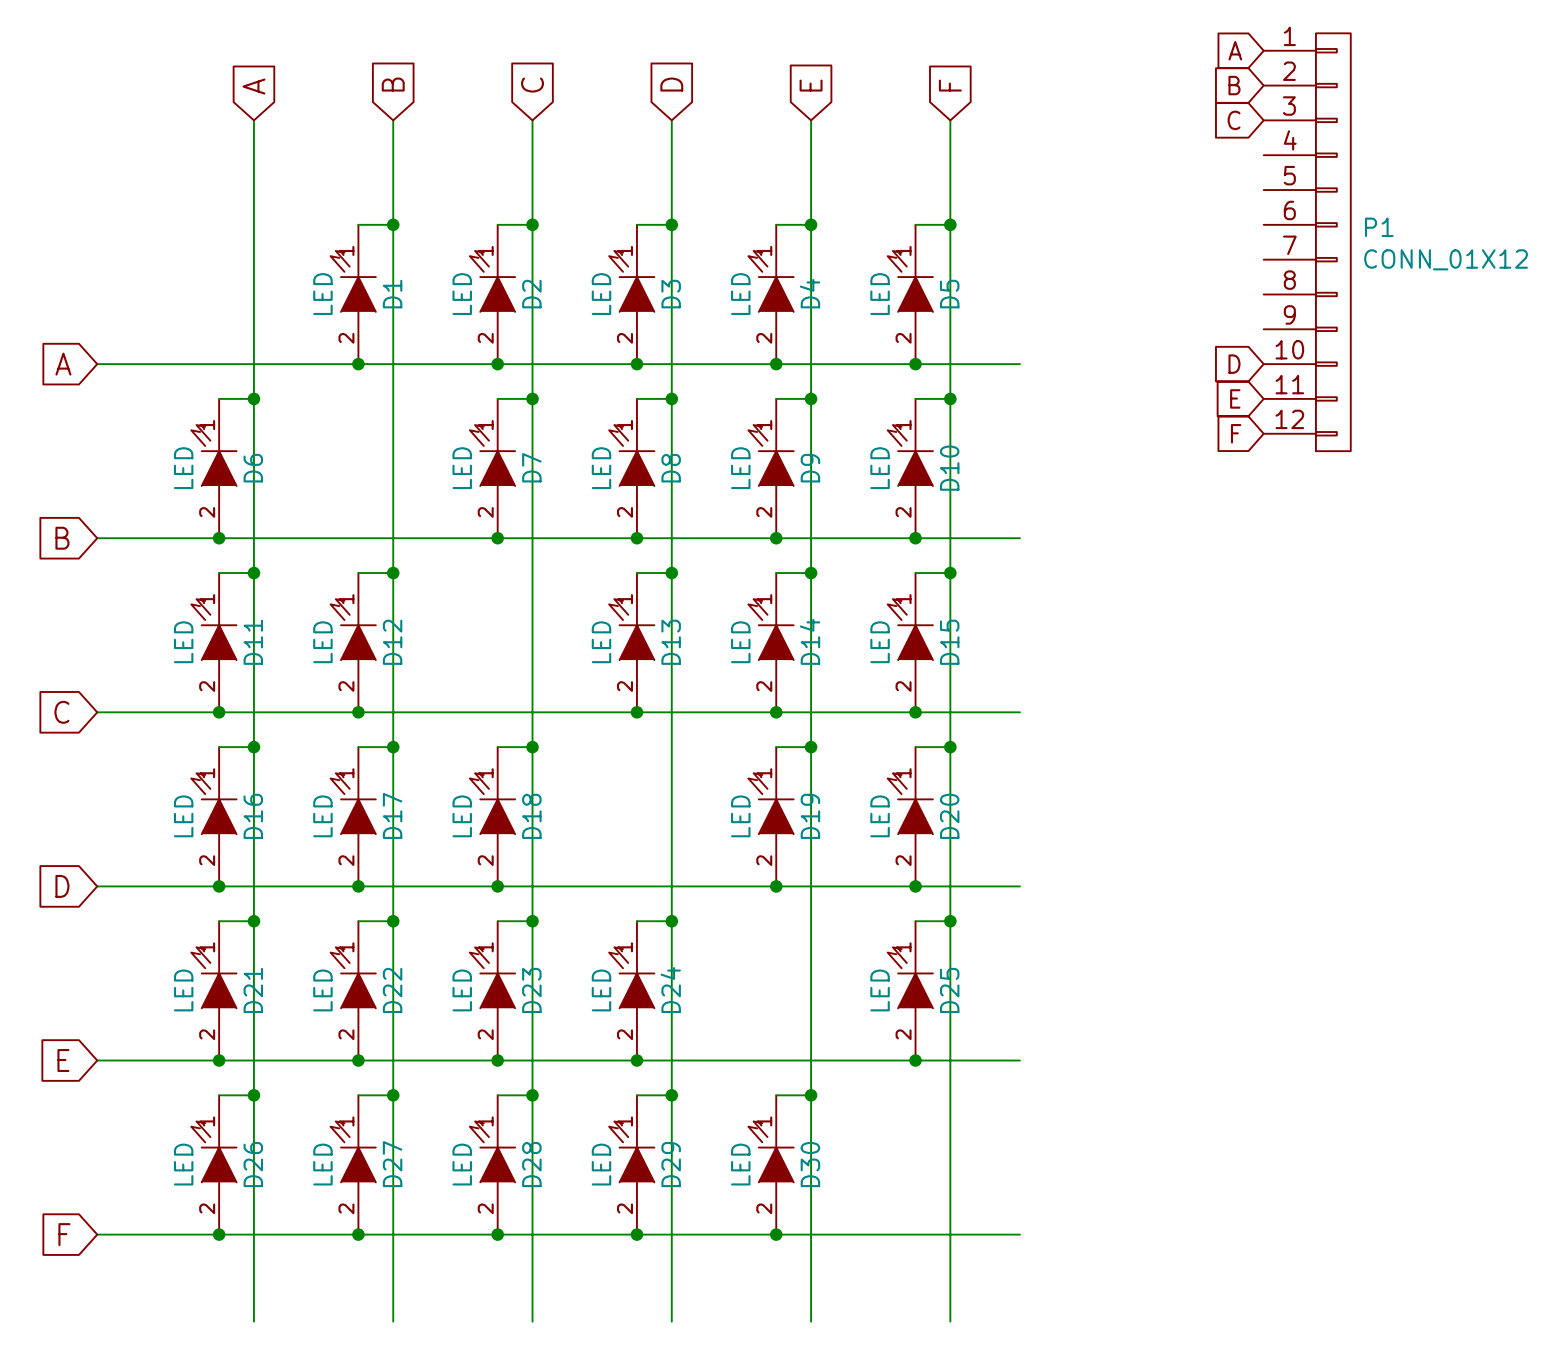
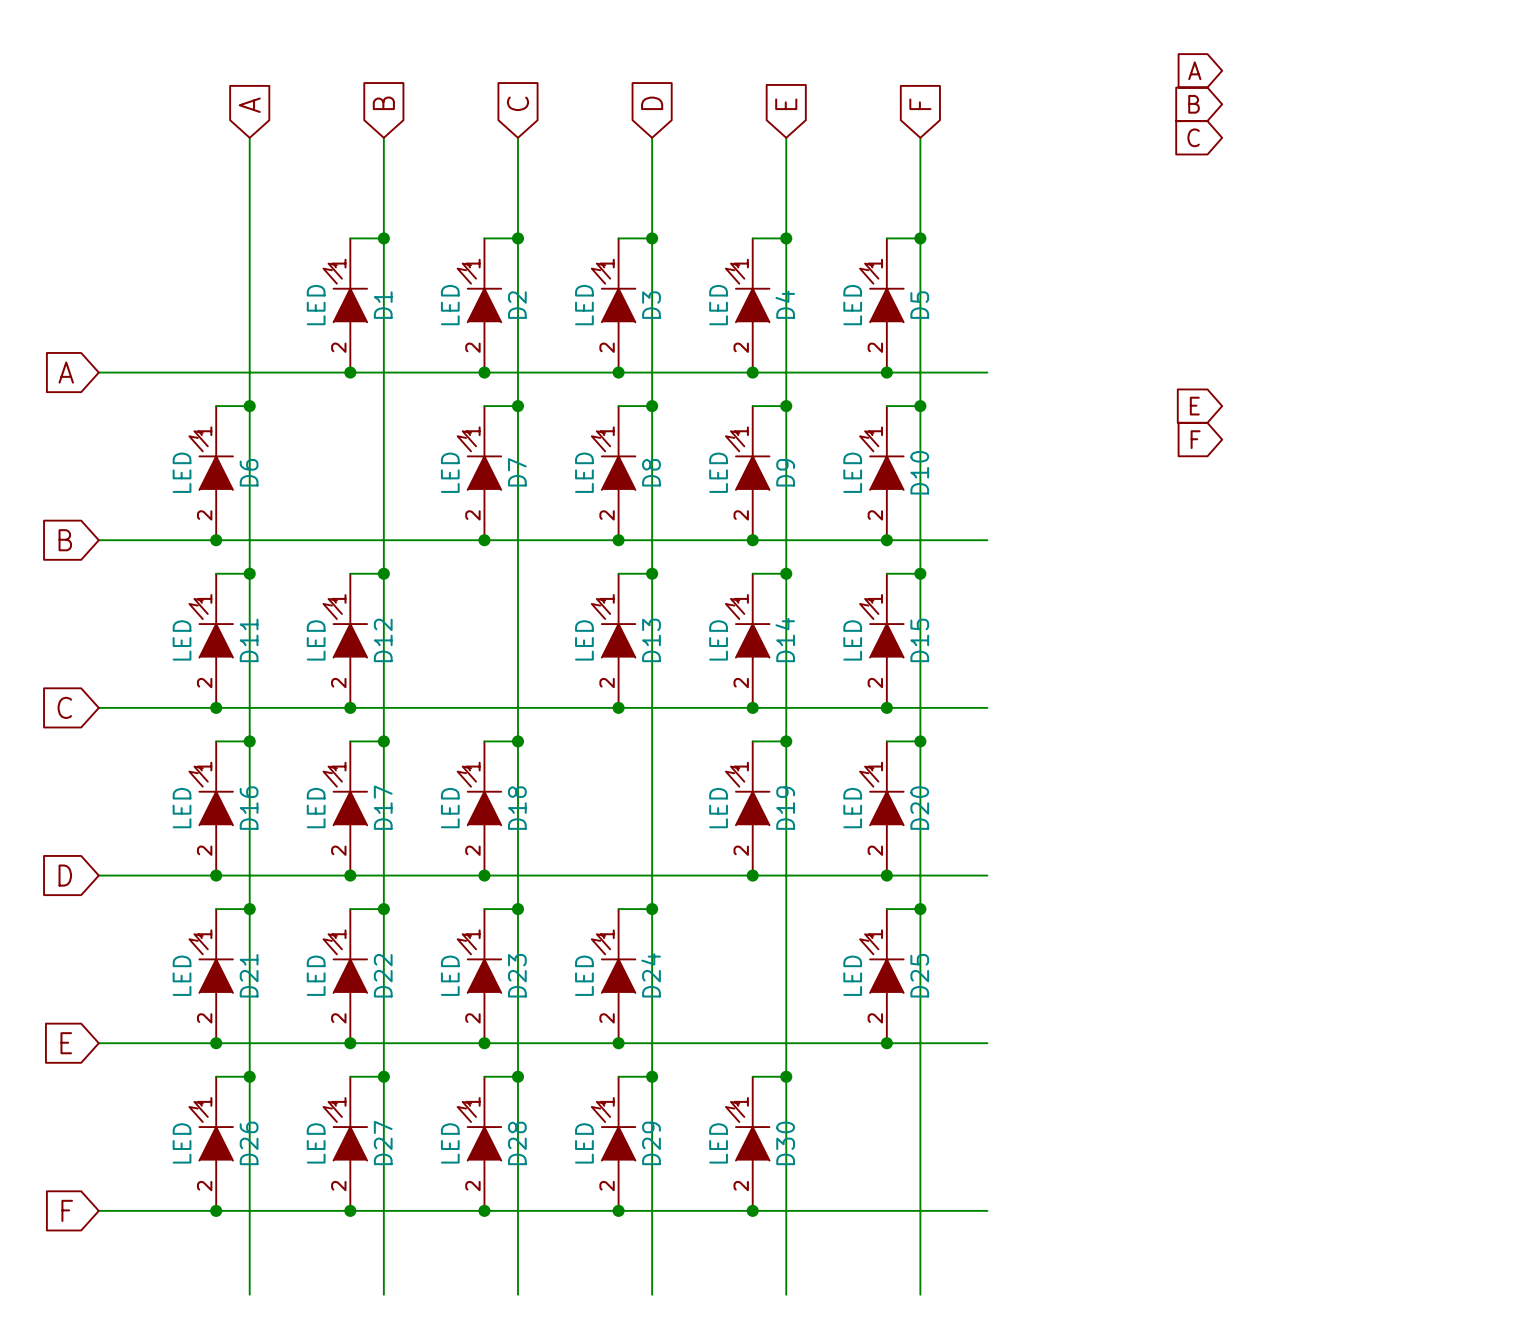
P1: CONN_01X12 (1307, 242) -> none
global label: D (1234, 364) -> none

